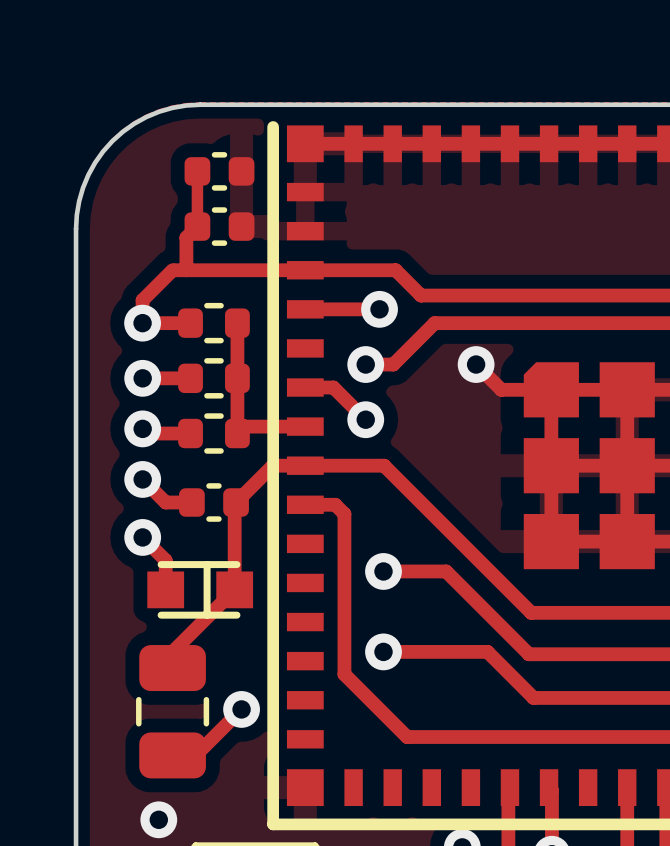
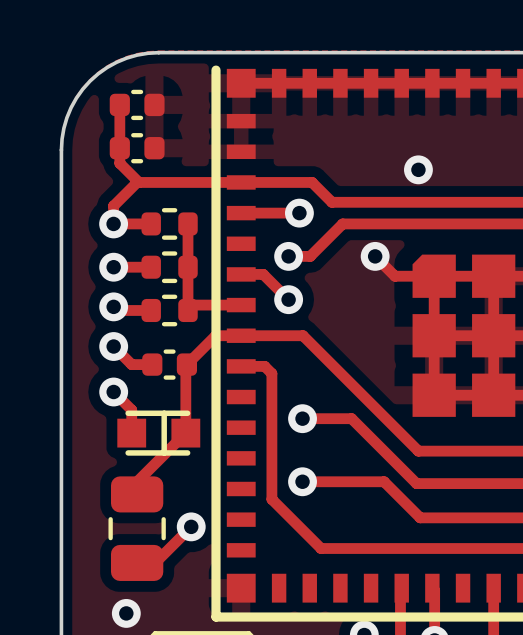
track: none -> (119, 104) (119, 163) (138, 182)
part: none -> (137, 104)
track: (197, 171) (197, 226) (186, 237) (186, 270) -> none
part: (219, 171) -> none
part: none -> (137, 148)
part: (219, 226) -> none
via: none -> (418, 169)

